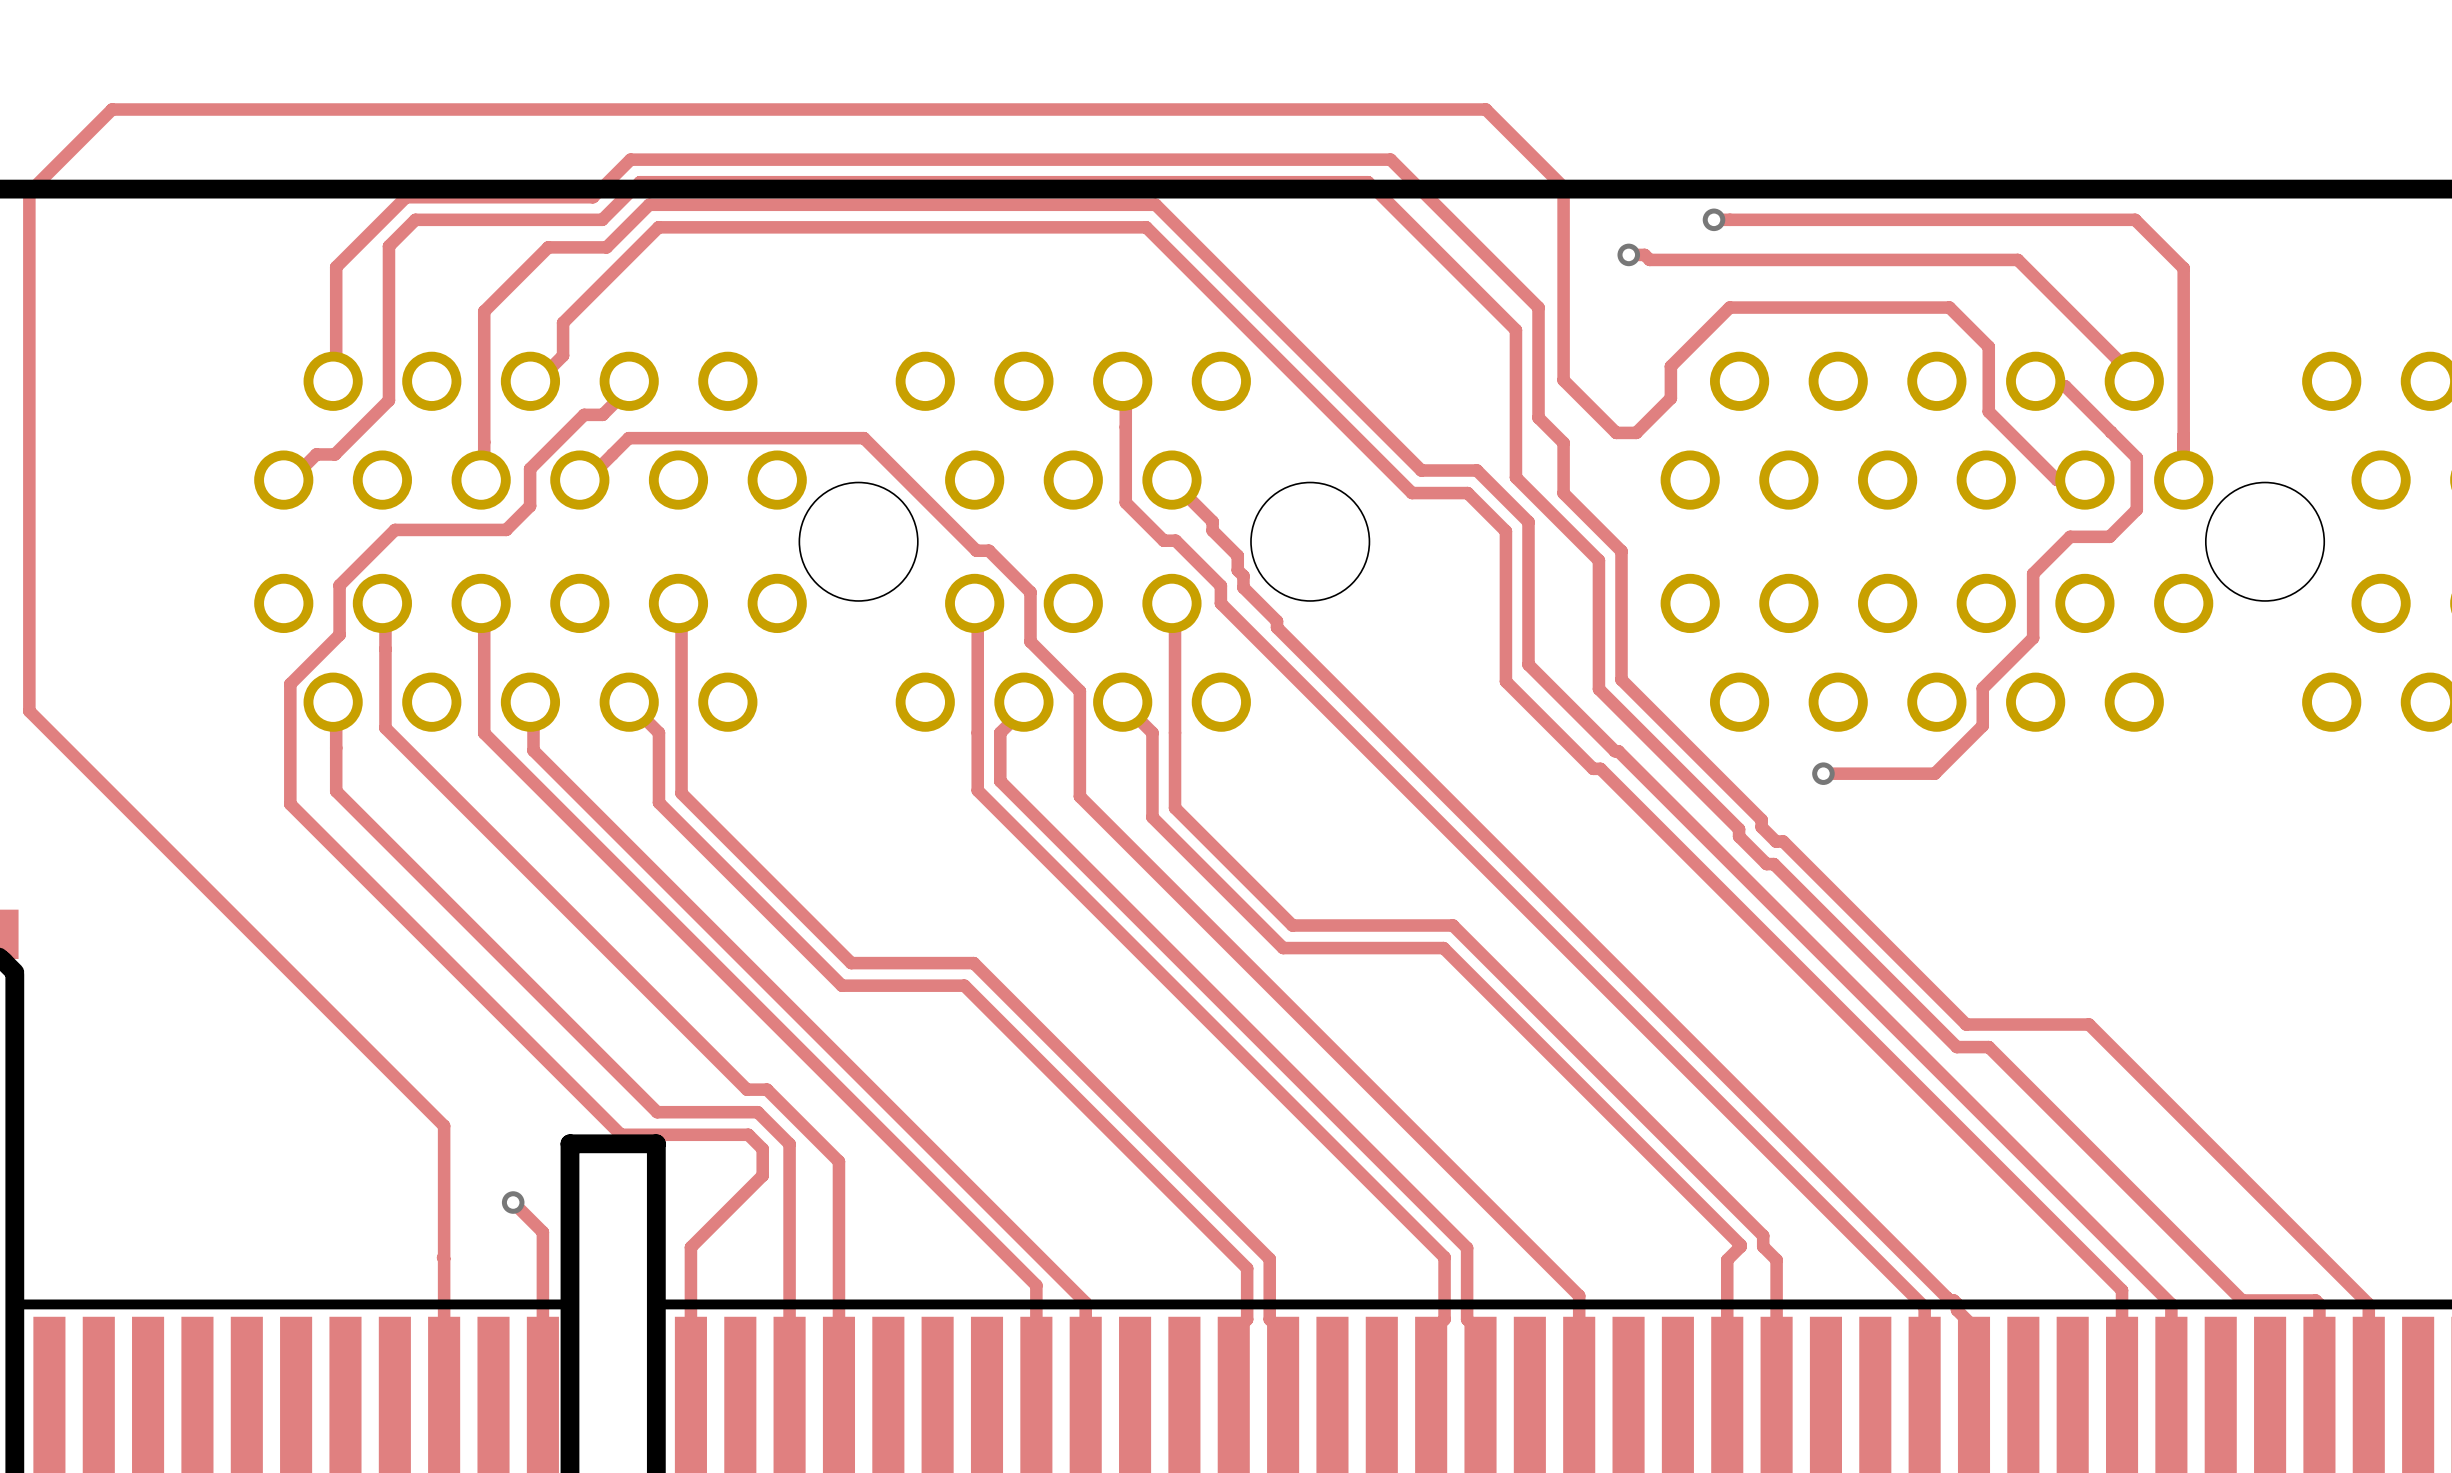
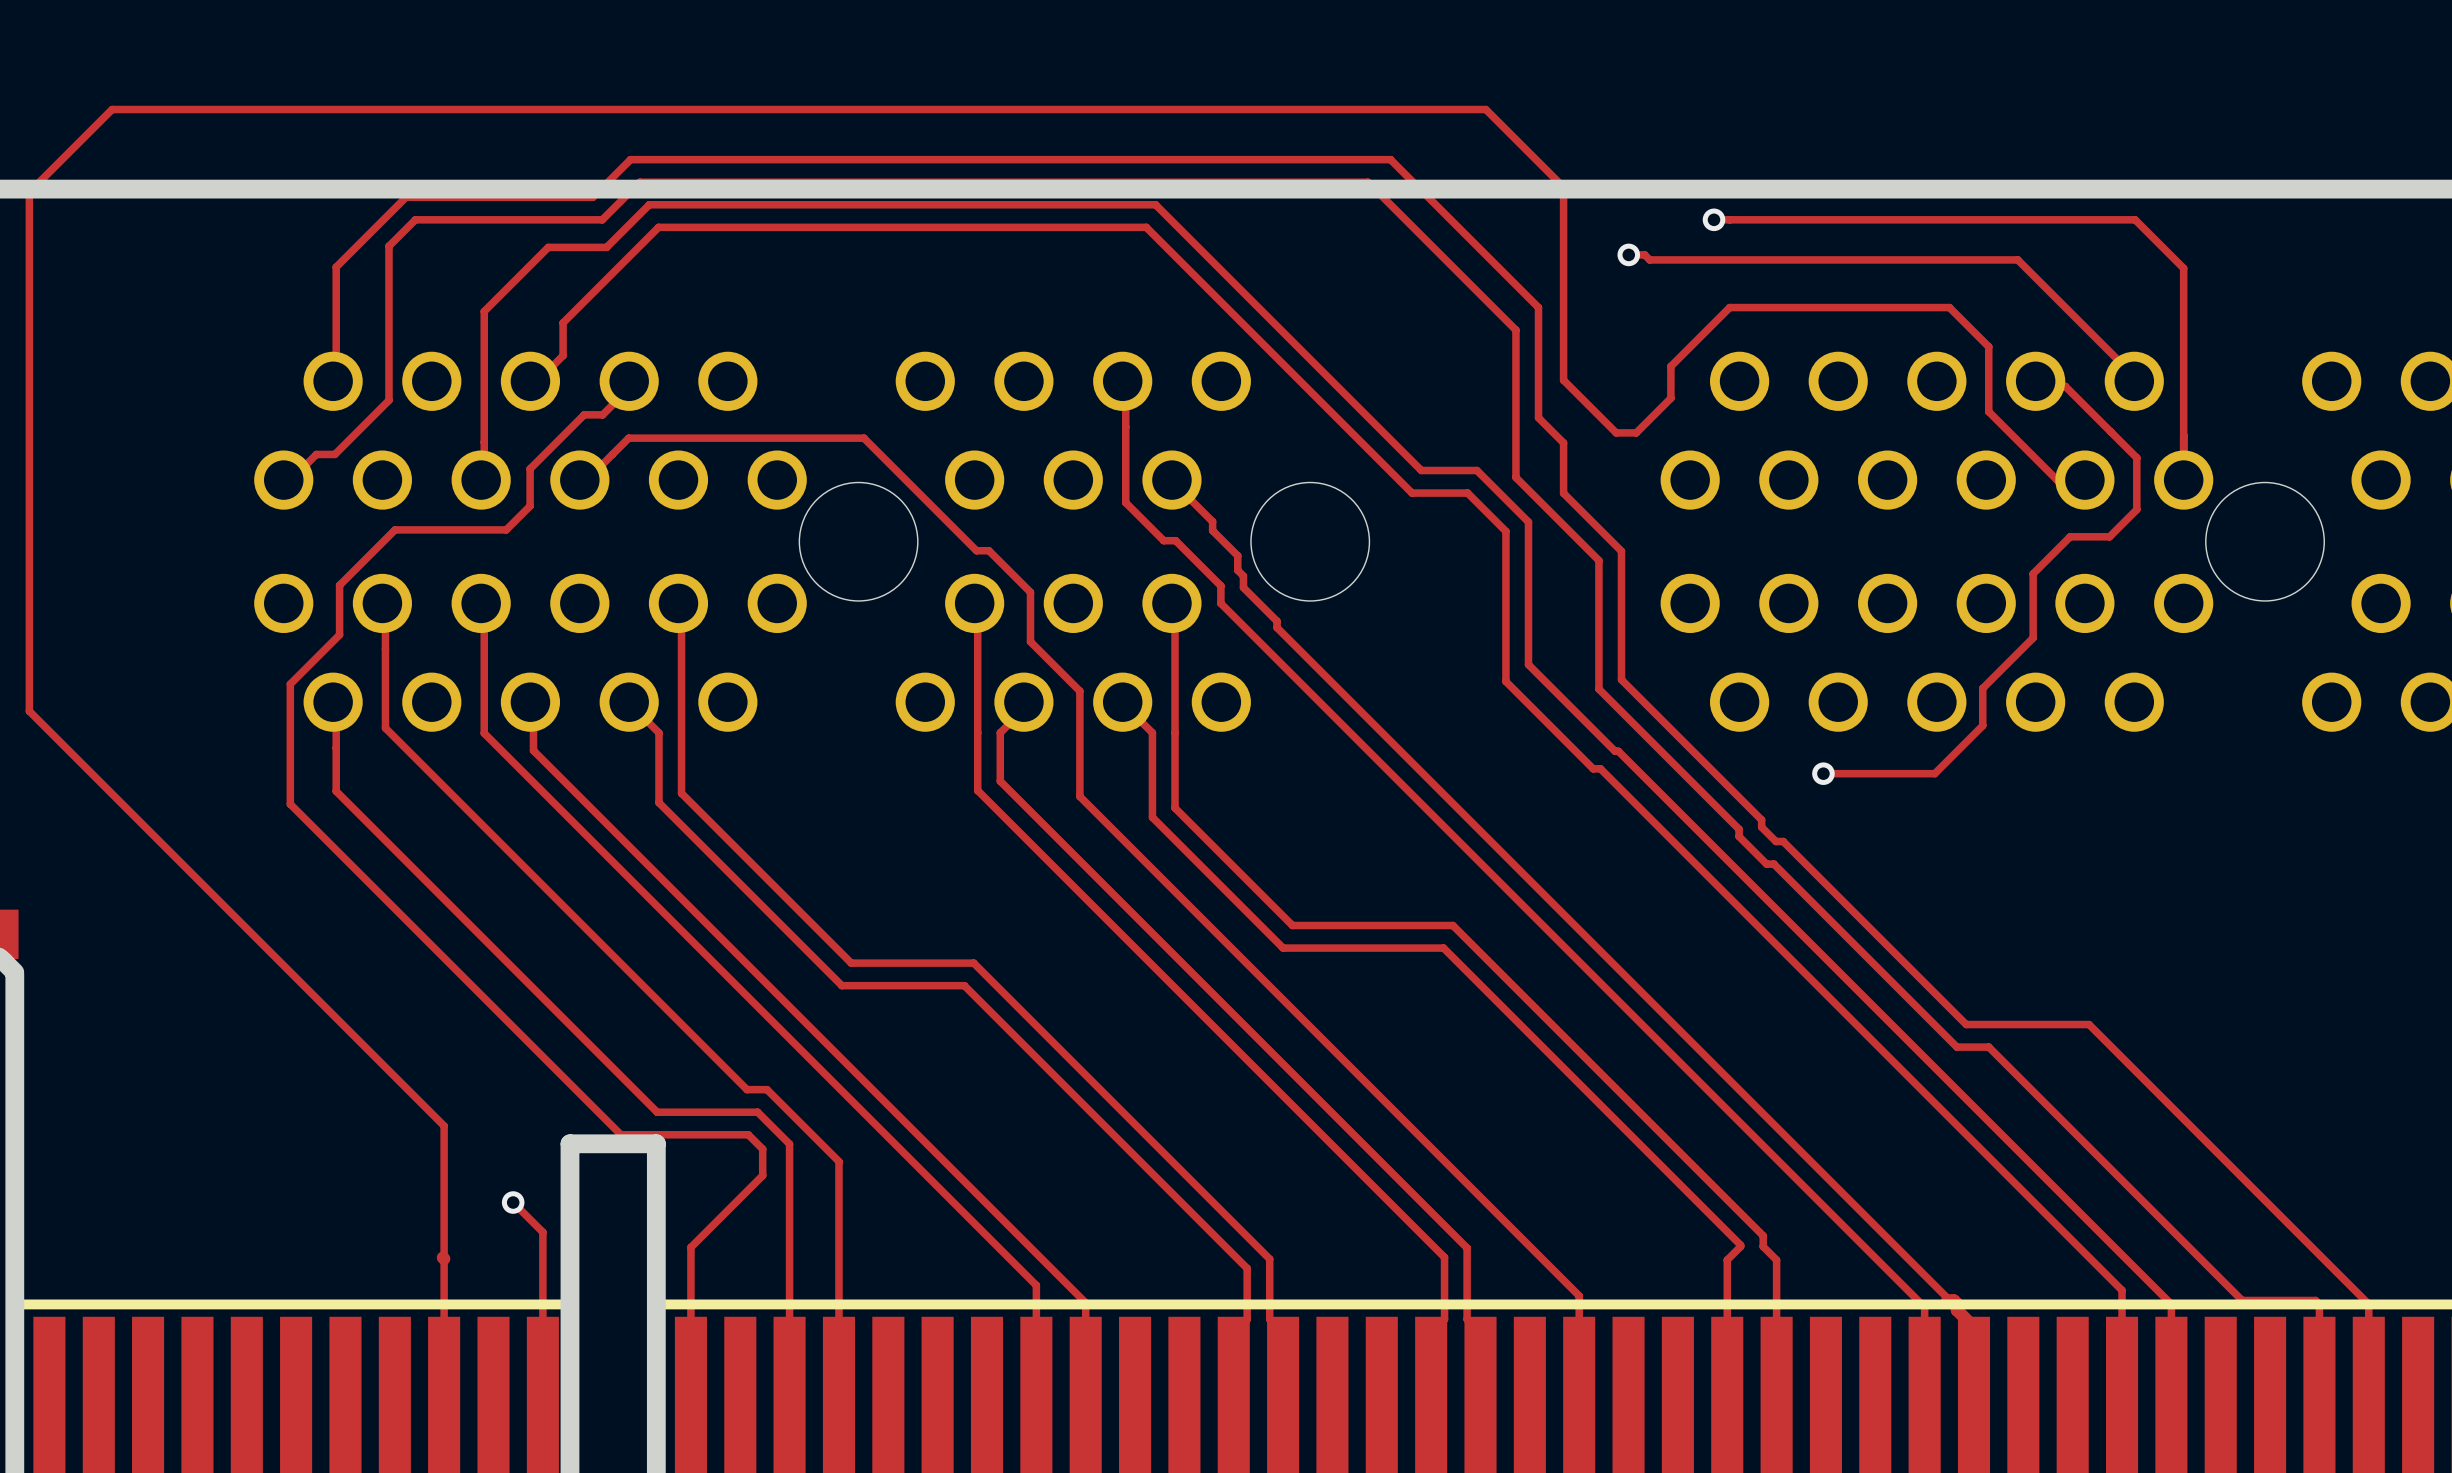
track width: thick (1714, 219) (2135, 219) (2183, 268) (2183, 480) -> thin (1714, 219) (2135, 219) (2183, 268) (2183, 480)
track width: thick (1628, 254) (1644, 254) (1649, 259) (2017, 259) (2117, 359) (2117, 364) (2134, 381) -> thin (1628, 254) (1644, 254) (1649, 259) (2017, 259) (2117, 359) (2117, 364) (2134, 381)
track width: thick (2035, 381) (2040, 386) (2065, 386) (2136, 457) (2136, 509) (2109, 536) (2070, 536) (2033, 573) (2033, 638) (1982, 688) (1982, 725) (1934, 773) (1823, 773) -> thin (2035, 381) (2040, 386) (2065, 386) (2136, 457) (2136, 509) (2109, 536) (2070, 536) (2033, 573) (2033, 638) (1982, 688) (1982, 725) (1934, 773) (1823, 773)
track width: thick (336, 385) (336, 267) (406, 197) (592, 197) (630, 159) (1390, 159) (1538, 307) (1538, 417) (1563, 442) (1563, 493) (1621, 551) (1621, 679) (1761, 819) (1761, 827) (1775, 841) (1783, 841) (1966, 1024) (2089, 1024) (2368, 1304) (2368, 1430) -> thin (336, 385) (336, 267) (406, 197) (592, 197) (630, 159) (1390, 159) (1538, 307) (1538, 417) (1563, 442) (1563, 493) (1621, 551) (1621, 679) (1761, 819) (1761, 827) (1775, 841) (1783, 841) (1966, 1024) (2089, 1024) (2368, 1304) (2368, 1430)
track width: thick (533, 385) (563, 355) (563, 322) (658, 227) (1146, 227) (1412, 493) (1467, 493) (1505, 531) (1505, 681) (1593, 768) (1600, 768) (2122, 1290) (2122, 1430) -> thin (533, 385) (563, 355) (563, 322) (658, 227) (1146, 227) (1412, 493) (1467, 493) (1505, 531) (1505, 681) (1593, 768) (1600, 768) (2122, 1290) (2122, 1430)
track width: thick (632, 385) (602, 414) (584, 414) (530, 468) (530, 506) (506, 529) (395, 529) (339, 585) (339, 634) (290, 684) (290, 804) (620, 1134) (748, 1134) (762, 1149) (762, 1175) (690, 1247) (690, 1430) -> thin (632, 385) (602, 414) (584, 414) (530, 468) (530, 506) (506, 529) (395, 529) (339, 585) (339, 634) (290, 684) (290, 804) (620, 1134) (748, 1134) (762, 1149) (762, 1175) (690, 1247) (690, 1430)
track width: thick (1125, 385) (1125, 502) (1163, 540) (1175, 540) (1220, 585) (1220, 603) (1924, 1307) (1924, 1430) -> thin (1125, 385) (1125, 502) (1163, 540) (1175, 540) (1220, 585) (1220, 603) (1924, 1307) (1924, 1430)
track width: thick (2084, 480) (2057, 480) (1988, 411) (1988, 346) (1949, 307) (1729, 307) (1670, 366) (1670, 398) (1636, 432) (1616, 432) (1563, 380) (1563, 187) (1485, 109) (112, 109) (29, 192) (29, 711) (444, 1125) (444, 1430) -> thin (2084, 480) (2057, 480) (1988, 411) (1988, 346) (1949, 307) (1729, 307) (1670, 366) (1670, 398) (1636, 432) (1616, 432) (1563, 380) (1563, 187) (1485, 109) (112, 109) (29, 192) (29, 711) (444, 1125) (444, 1430)
track width: thick (304, 484) (286, 484) (316, 454) (334, 454) (388, 400) (388, 246) (415, 219) (602, 219) (639, 182) (1368, 182) (1515, 330) (1515, 477) (1598, 560) (1598, 689) (1739, 829) (1739, 836) (1766, 864) (1773, 864) (1956, 1047) (1988, 1047) (2242, 1300) (2315, 1300) (2319, 1304) (2319, 1430) -> thin (304, 484) (286, 484) (316, 454) (334, 454) (388, 400) (388, 246) (415, 219) (602, 219) (639, 182) (1368, 182) (1515, 330) (1515, 477) (1598, 560) (1598, 689) (1739, 829) (1739, 836) (1766, 864) (1773, 864) (1956, 1047) (1988, 1047) (2242, 1300) (2315, 1300) (2319, 1304) (2319, 1430)
track width: thick (484, 484) (484, 311) (548, 247) (606, 247) (649, 204) (1155, 204) (1421, 470) (1476, 470) (1528, 522) (1528, 664) (1615, 751) (1618, 751) (2171, 1304) (2171, 1430) -> thin (484, 484) (484, 311) (548, 247) (606, 247) (649, 204) (1155, 204) (1421, 470) (1476, 470) (1528, 522) (1528, 664) (1615, 751) (1618, 751) (2171, 1304) (2171, 1430)
track width: thick (582, 484) (628, 438) (863, 438) (976, 550) (988, 550) (1030, 592) (1030, 641) (1079, 691) (1079, 796) (1579, 1295) (1579, 1430) -> thin (582, 484) (628, 438) (863, 438) (976, 550) (988, 550) (1030, 592) (1030, 641) (1079, 691) (1079, 796) (1579, 1295) (1579, 1430)
track width: thick (1175, 484) (1212, 521) (1212, 530) (1237, 555) (1237, 570) (1243, 576) (1243, 587) (1277, 621) (1277, 627) (1947, 1297) (1947, 1300) -> thin (1175, 484) (1212, 521) (1212, 530) (1237, 555) (1237, 570) (1243, 576) (1243, 587) (1277, 621) (1277, 627) (1947, 1297) (1947, 1300)
track width: thick (385, 607) (385, 728) (747, 1089) (767, 1089) (838, 1161) (838, 1430) -> thin (385, 607) (385, 728) (747, 1089) (767, 1089) (838, 1161) (838, 1430)
track width: thick (484, 607) (484, 733) (1036, 1285) (1036, 1430) -> thin (484, 607) (484, 733) (1036, 1285) (1036, 1430)
track width: thick (681, 607) (681, 793) (851, 963) (973, 963) (1269, 1259) (1269, 1319) (1283, 1332) (1283, 1430) -> thin (681, 607) (681, 793) (851, 963) (973, 963) (1269, 1259) (1269, 1319) (1283, 1332) (1283, 1430)
track width: thick (977, 607) (977, 790) (1444, 1257) (1444, 1319) (1431, 1332) (1431, 1430) -> thin (977, 607) (977, 790) (1444, 1257) (1444, 1319) (1431, 1332) (1431, 1430)
track width: thick (1175, 607) (1175, 808) (1292, 925) (1452, 925) (1763, 1235) (1763, 1246) (1776, 1260) (1776, 1430) -> thin (1175, 607) (1175, 808) (1292, 925) (1452, 925) (1763, 1235) (1763, 1246) (1776, 1260) (1776, 1430)
track width: thick (336, 706) (336, 791) (657, 1112) (757, 1112) (789, 1144) (789, 1430) -> thin (336, 706) (336, 791) (657, 1112) (757, 1112) (789, 1144) (789, 1430)
track width: thick (533, 706) (533, 750) (1085, 1302) (1085, 1430) -> thin (533, 706) (533, 750) (1085, 1302) (1085, 1430)
track width: thick (632, 706) (658, 732) (658, 802) (841, 985) (964, 985) (1247, 1268) (1247, 1319) (1233, 1332) (1233, 1430) -> thin (632, 706) (658, 732) (658, 802) (841, 985) (964, 985) (1247, 1268) (1247, 1319) (1233, 1332) (1233, 1430)
track width: thick (1026, 706) (1000, 732) (1000, 781) (1467, 1248) (1467, 1319) (1480, 1332) (1480, 1430) -> thin (1026, 706) (1000, 732) (1000, 781) (1467, 1248) (1467, 1319) (1480, 1332) (1480, 1430)
track width: thick (1125, 706) (1152, 732) (1152, 817) (1283, 948) (1443, 948) (1740, 1245) (1727, 1260) (1727, 1430) -> thin (1125, 706) (1152, 732) (1152, 817) (1283, 948) (1443, 948) (1740, 1245) (1727, 1260) (1727, 1430)
track width: thick (513, 1202) (542, 1232) (542, 1430) -> thin (513, 1202) (542, 1232) (542, 1430)

